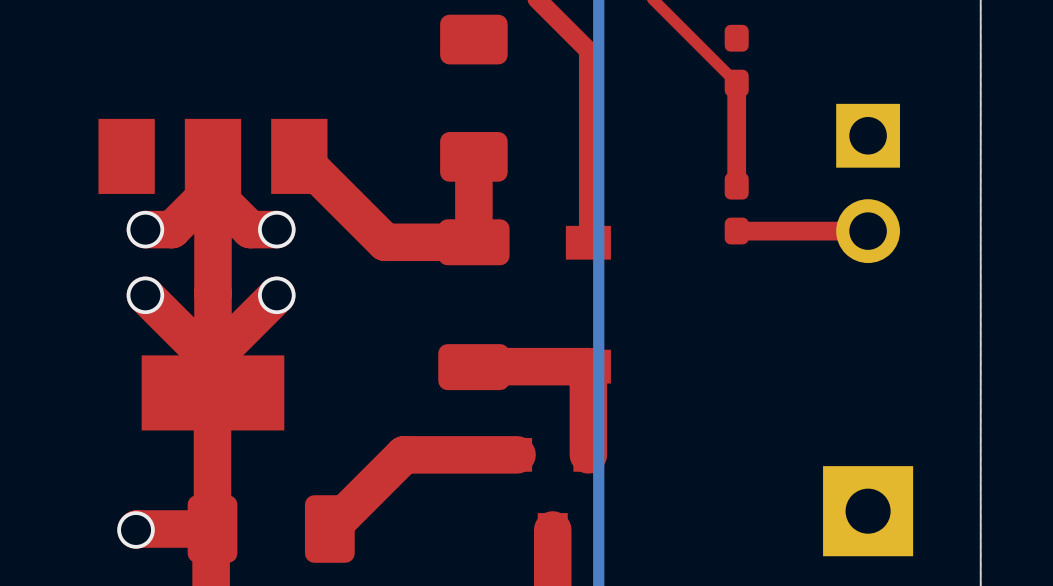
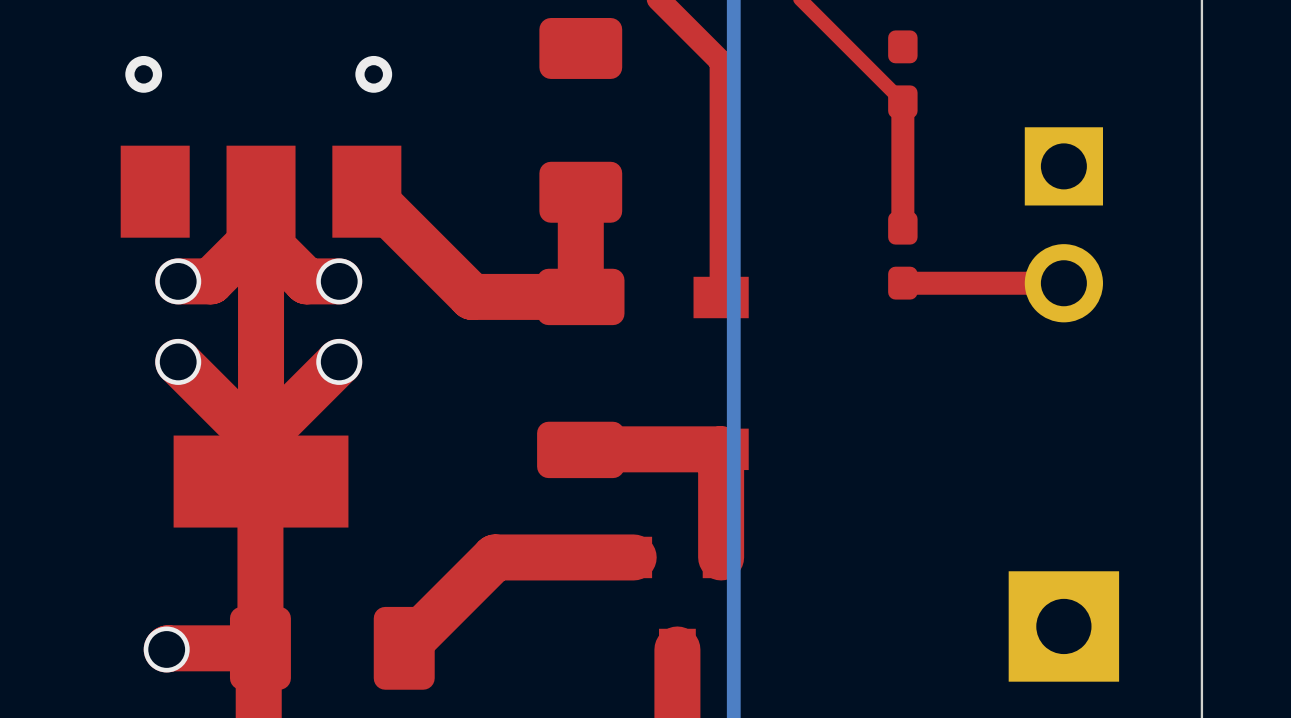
via: none -> (143, 74)
via: none -> (373, 74)

